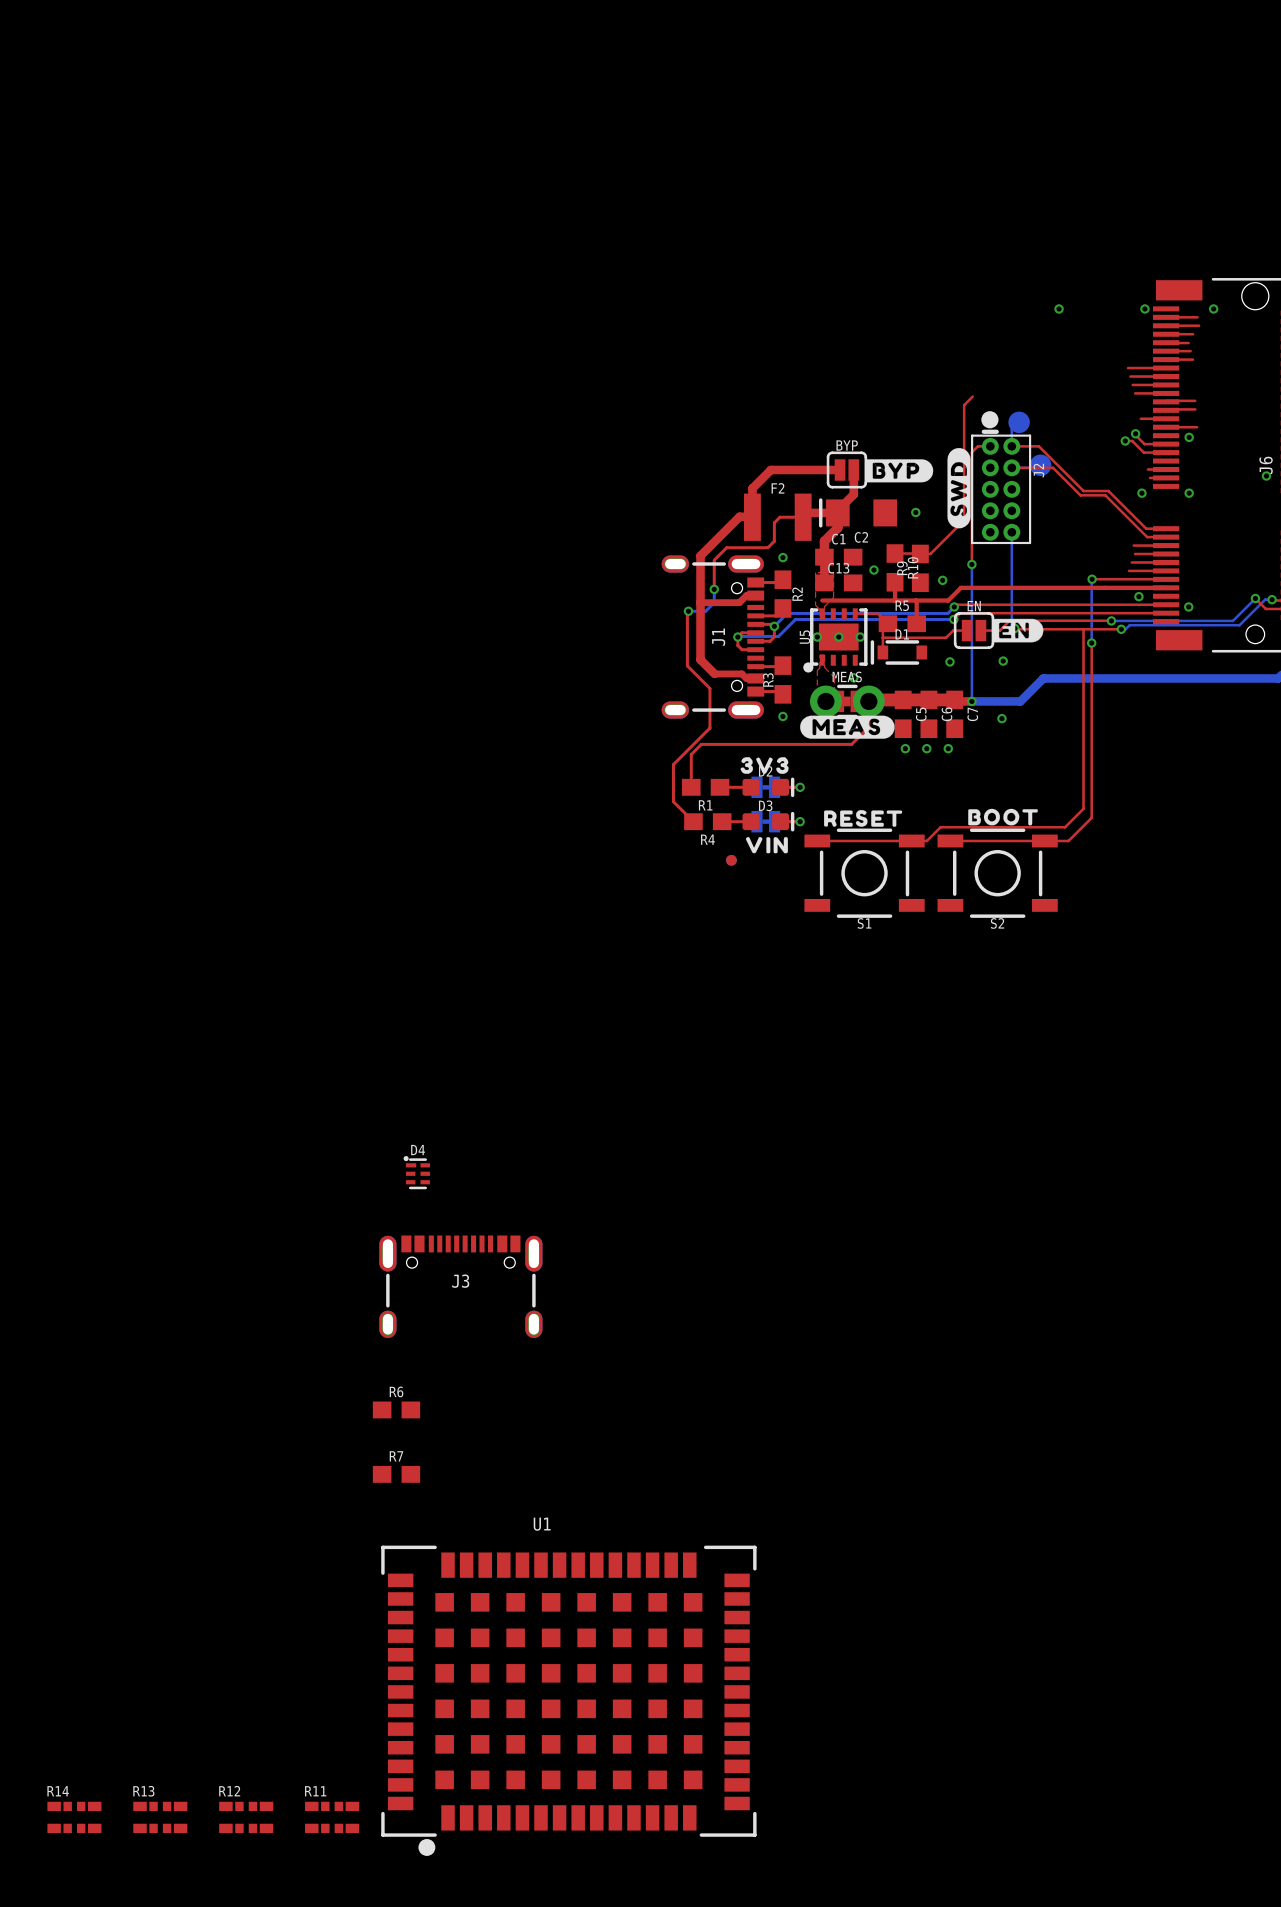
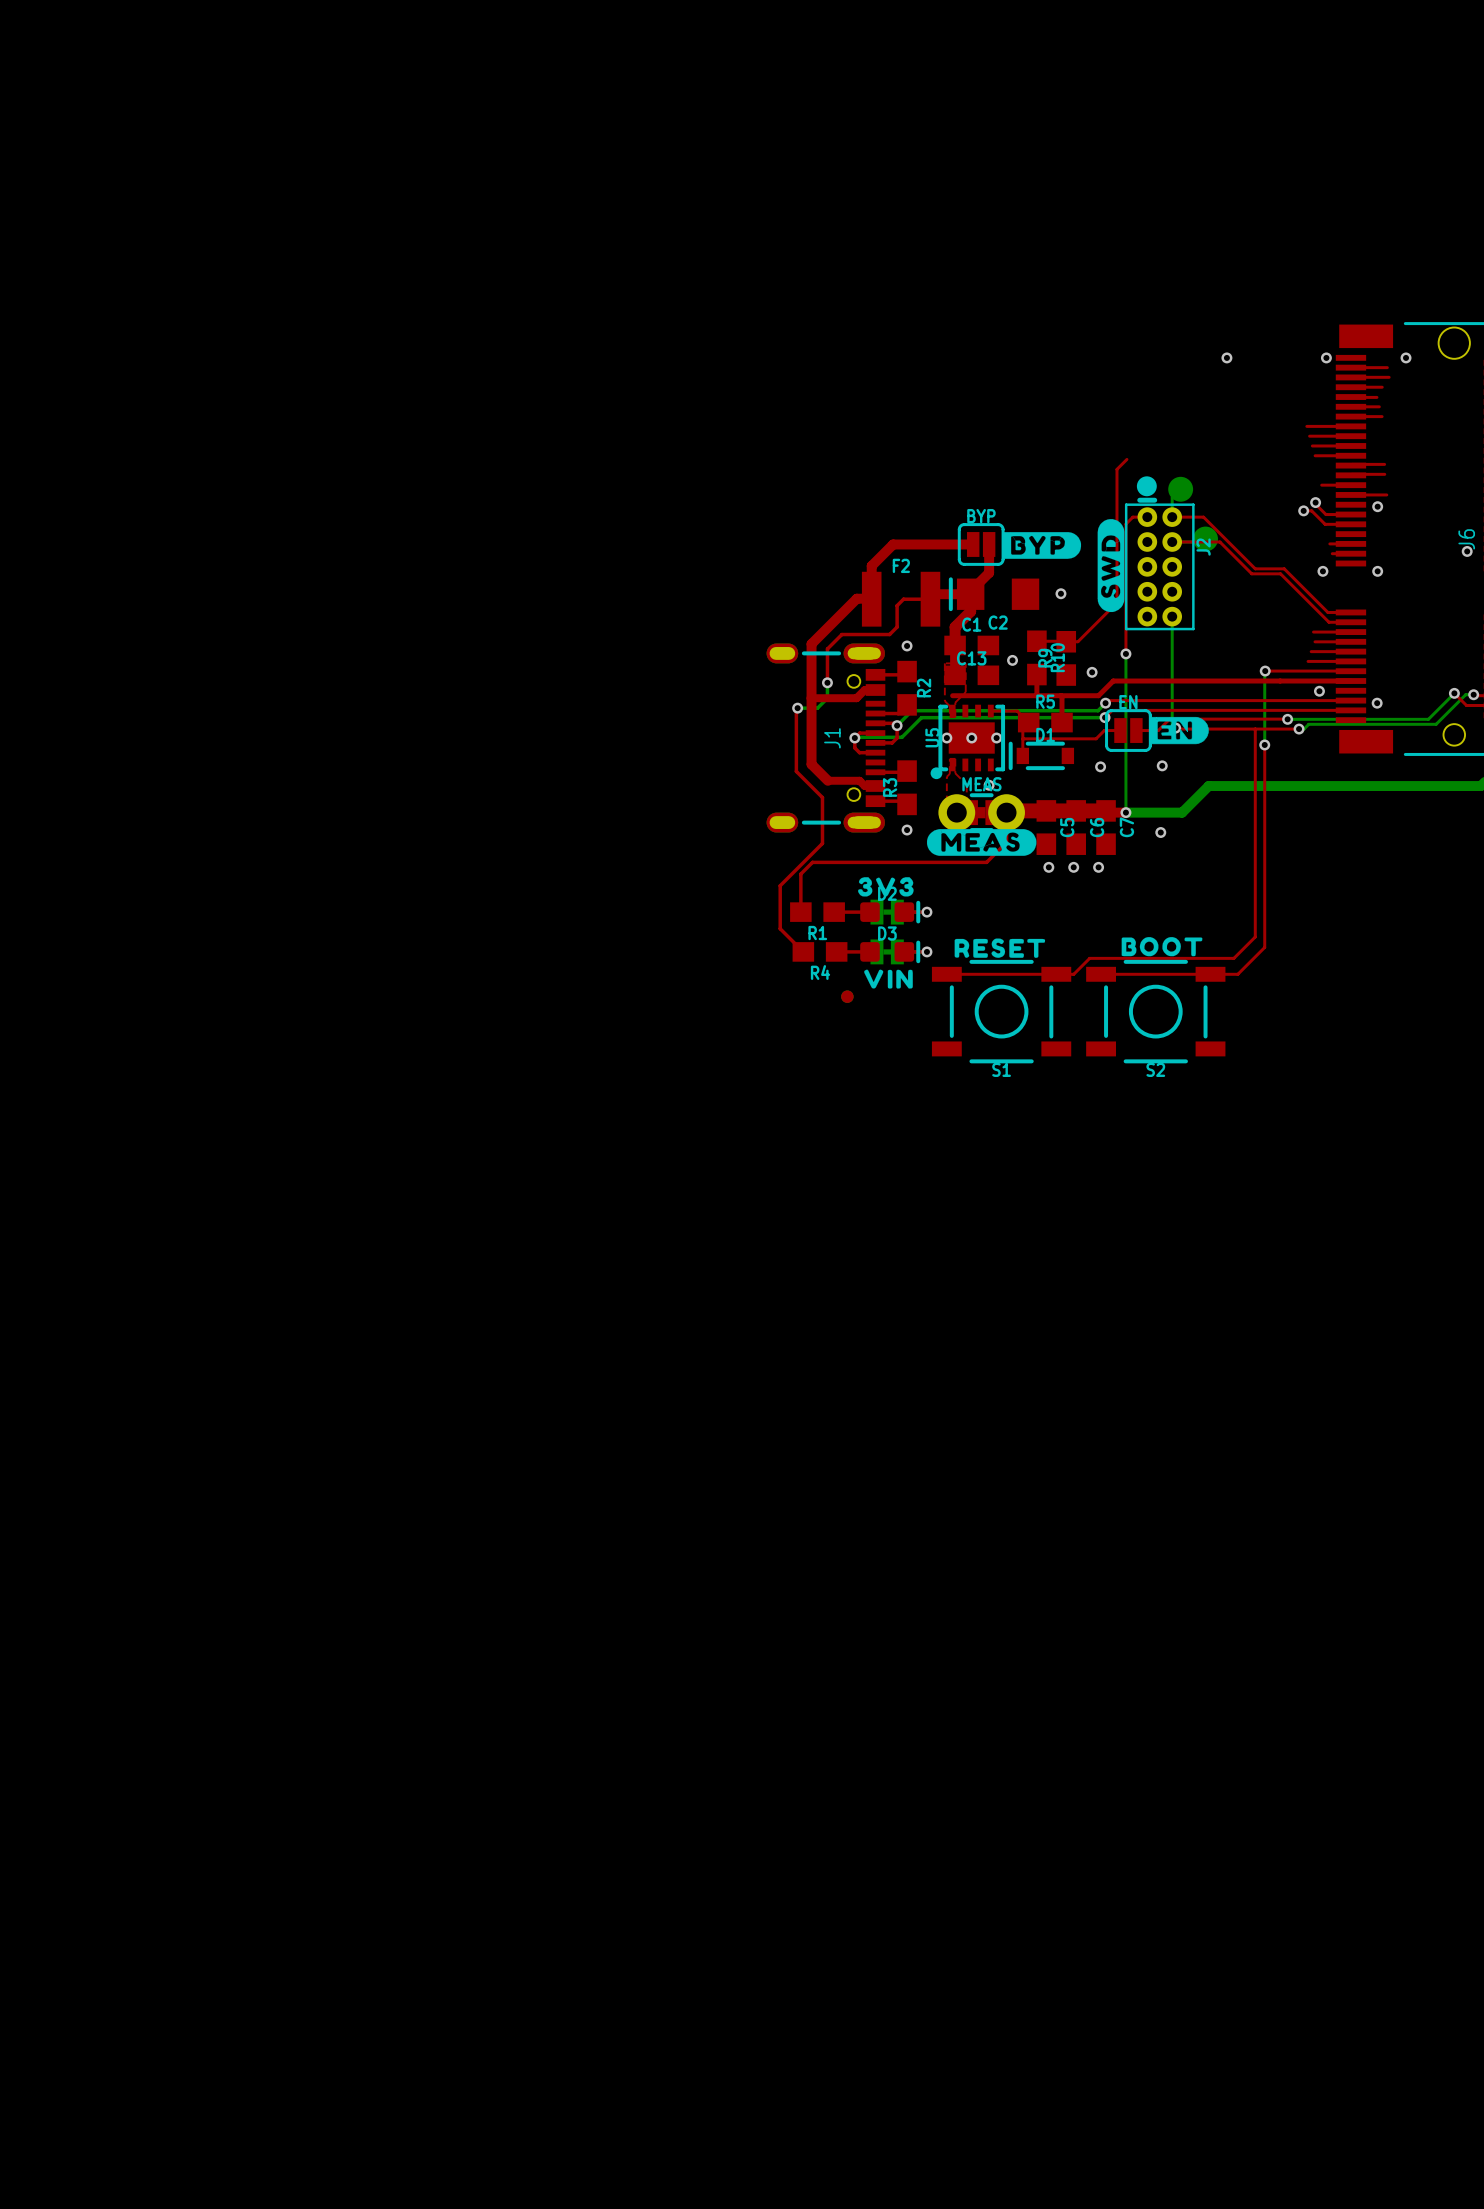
D4: (416, 1172) -> none
J3: (460, 1286) -> none
R6: (396, 1409) -> none
R7: (396, 1474) -> none
U1: (568, 1700) -> none
R14: (74, 1817) -> none
R13: (160, 1817) -> none
R12: (246, 1817) -> none
R11: (332, 1817) -> none

